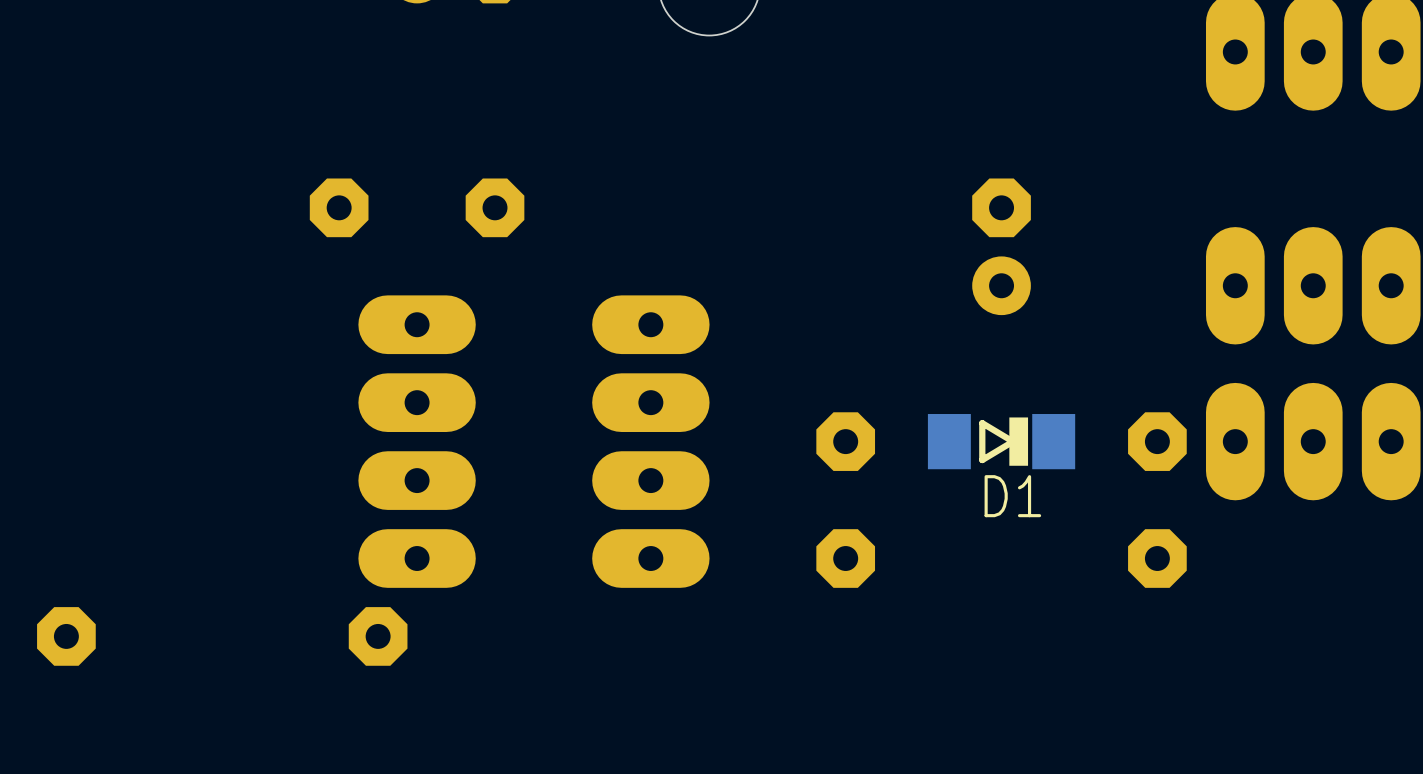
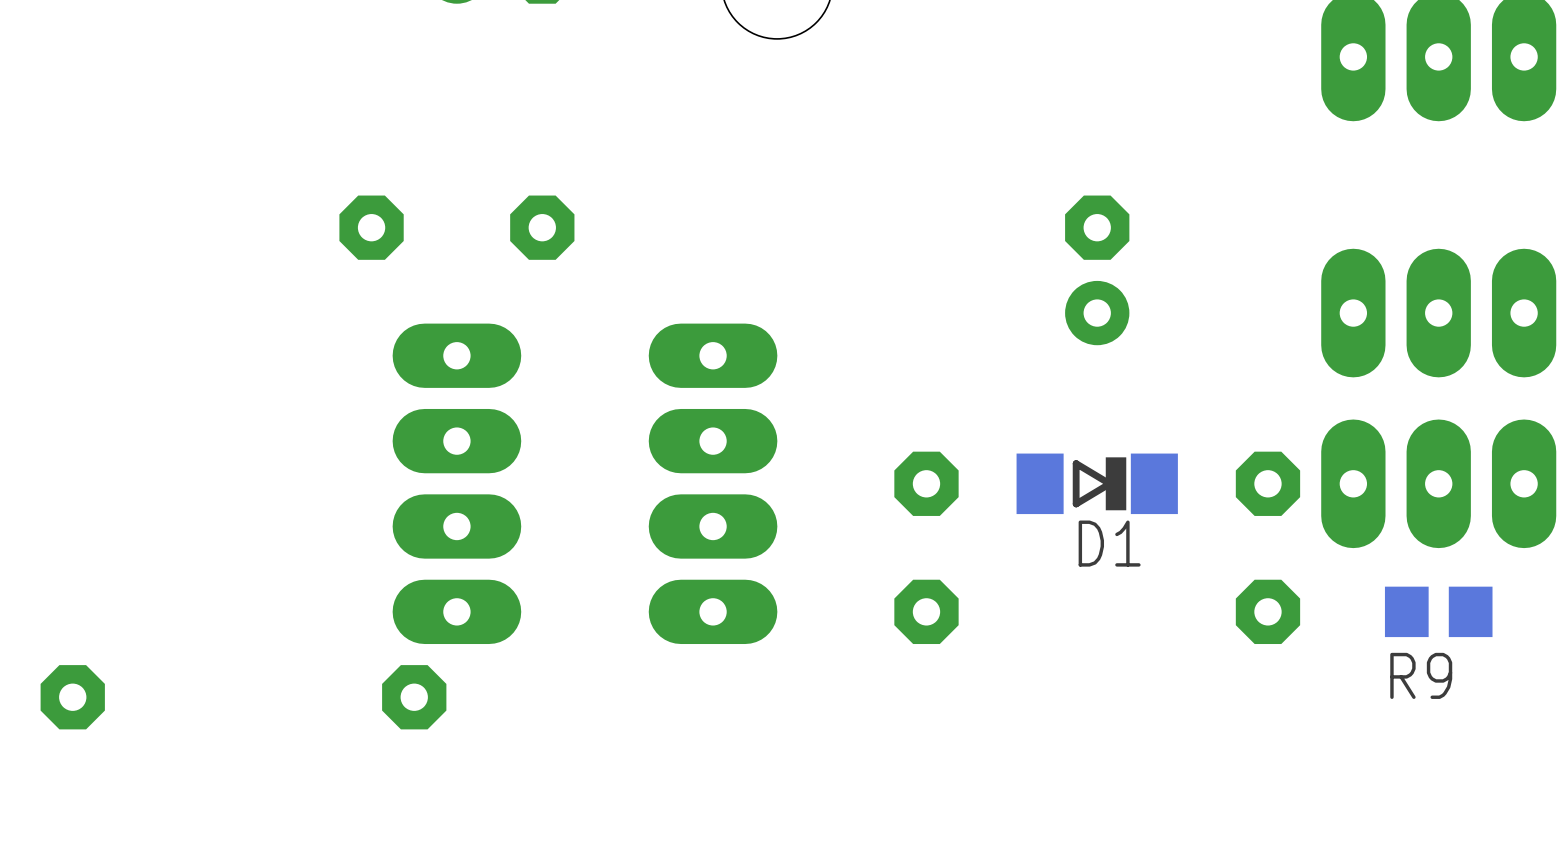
R9: none -> (1438, 611)

